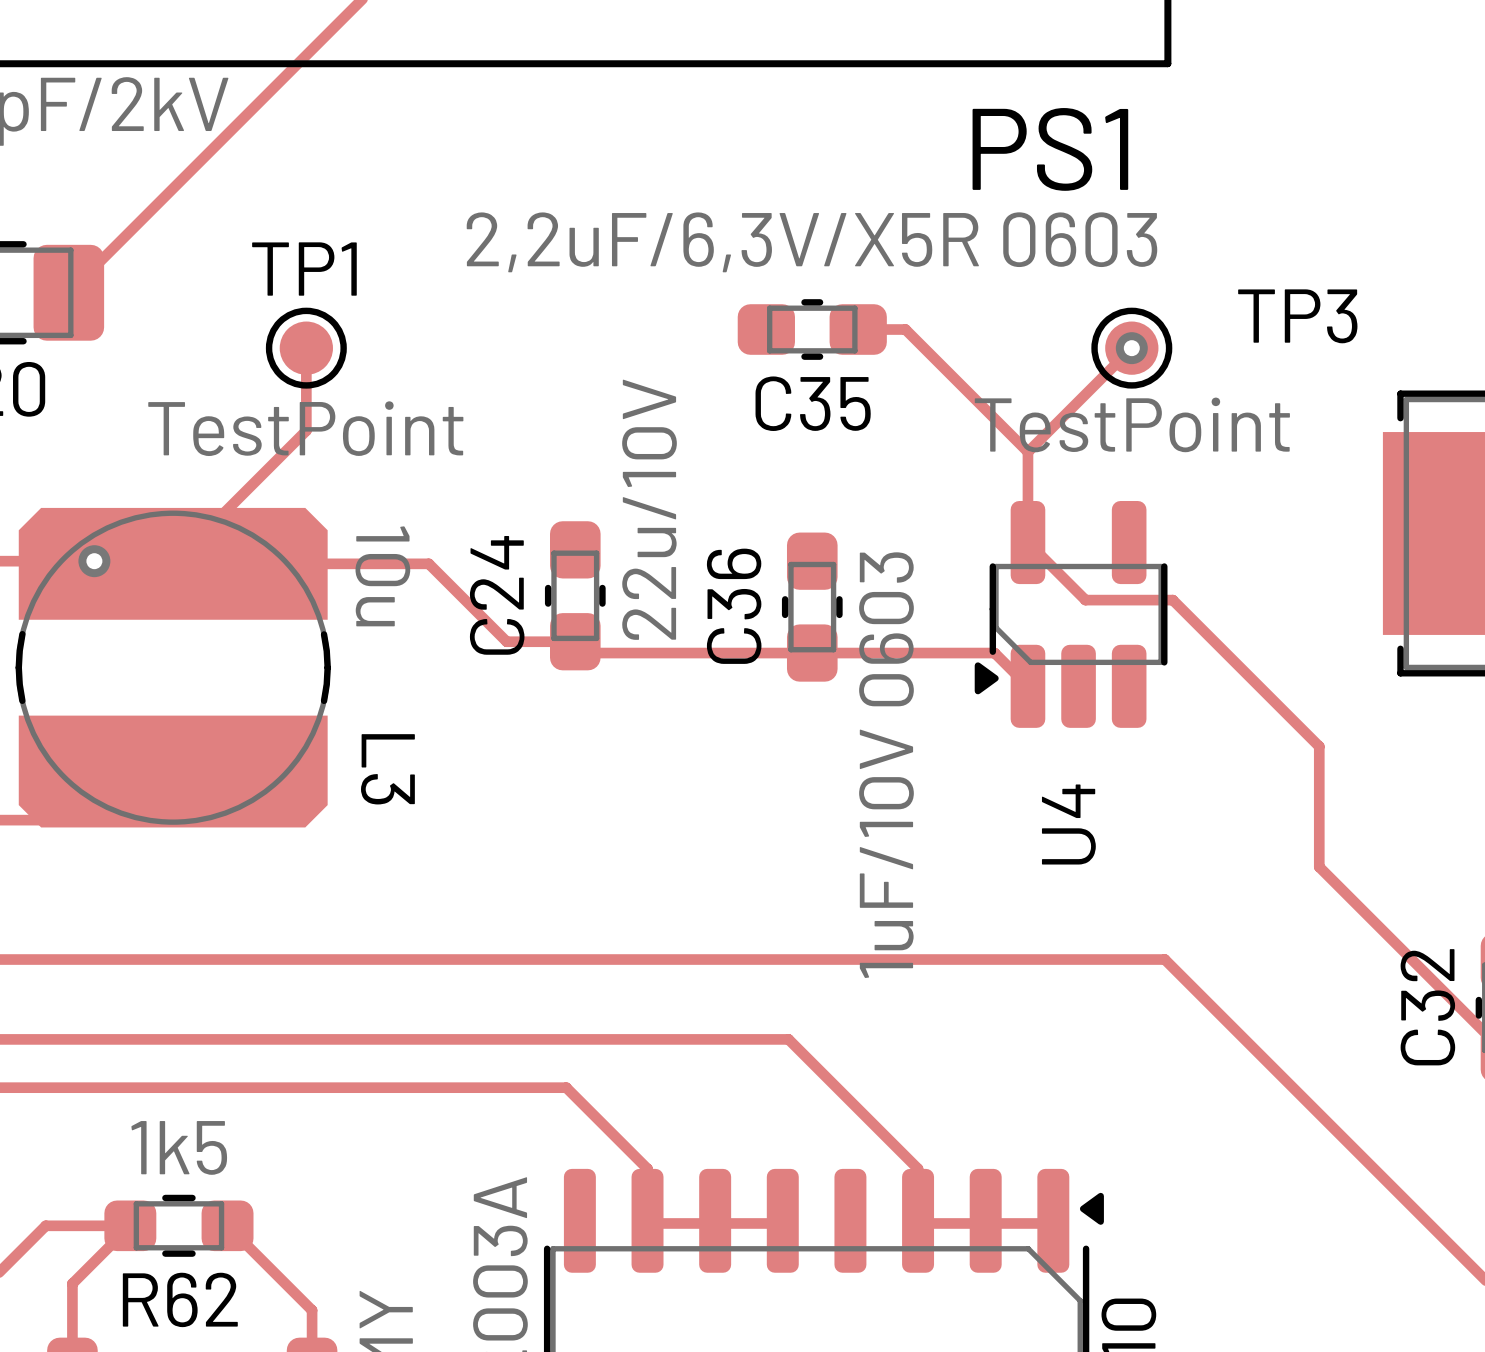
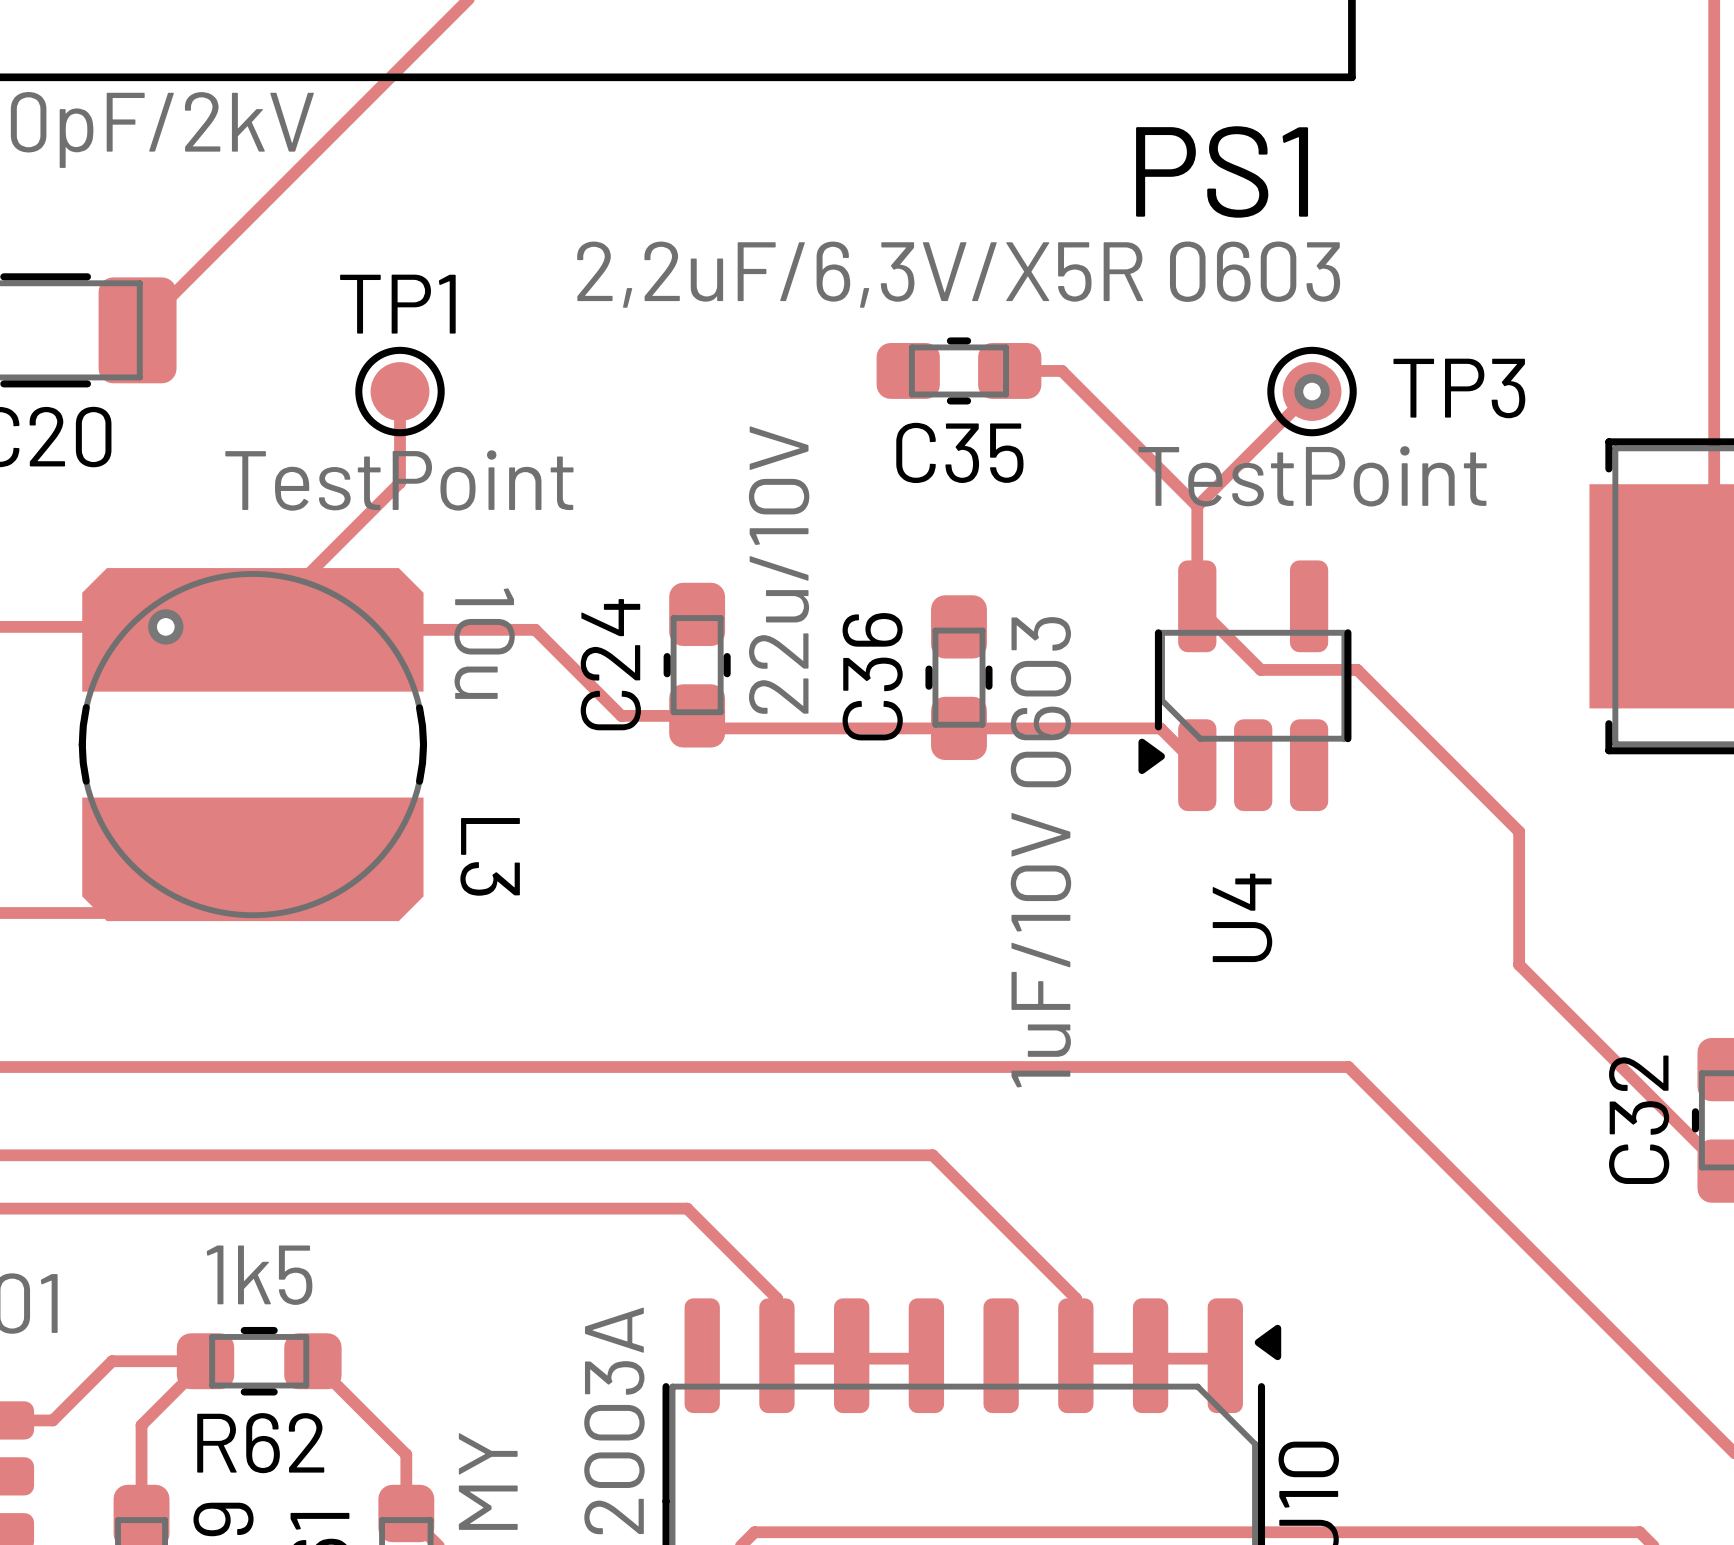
TP3 name position: TP3 (1297, 316) -> TP3 (1459, 388)

